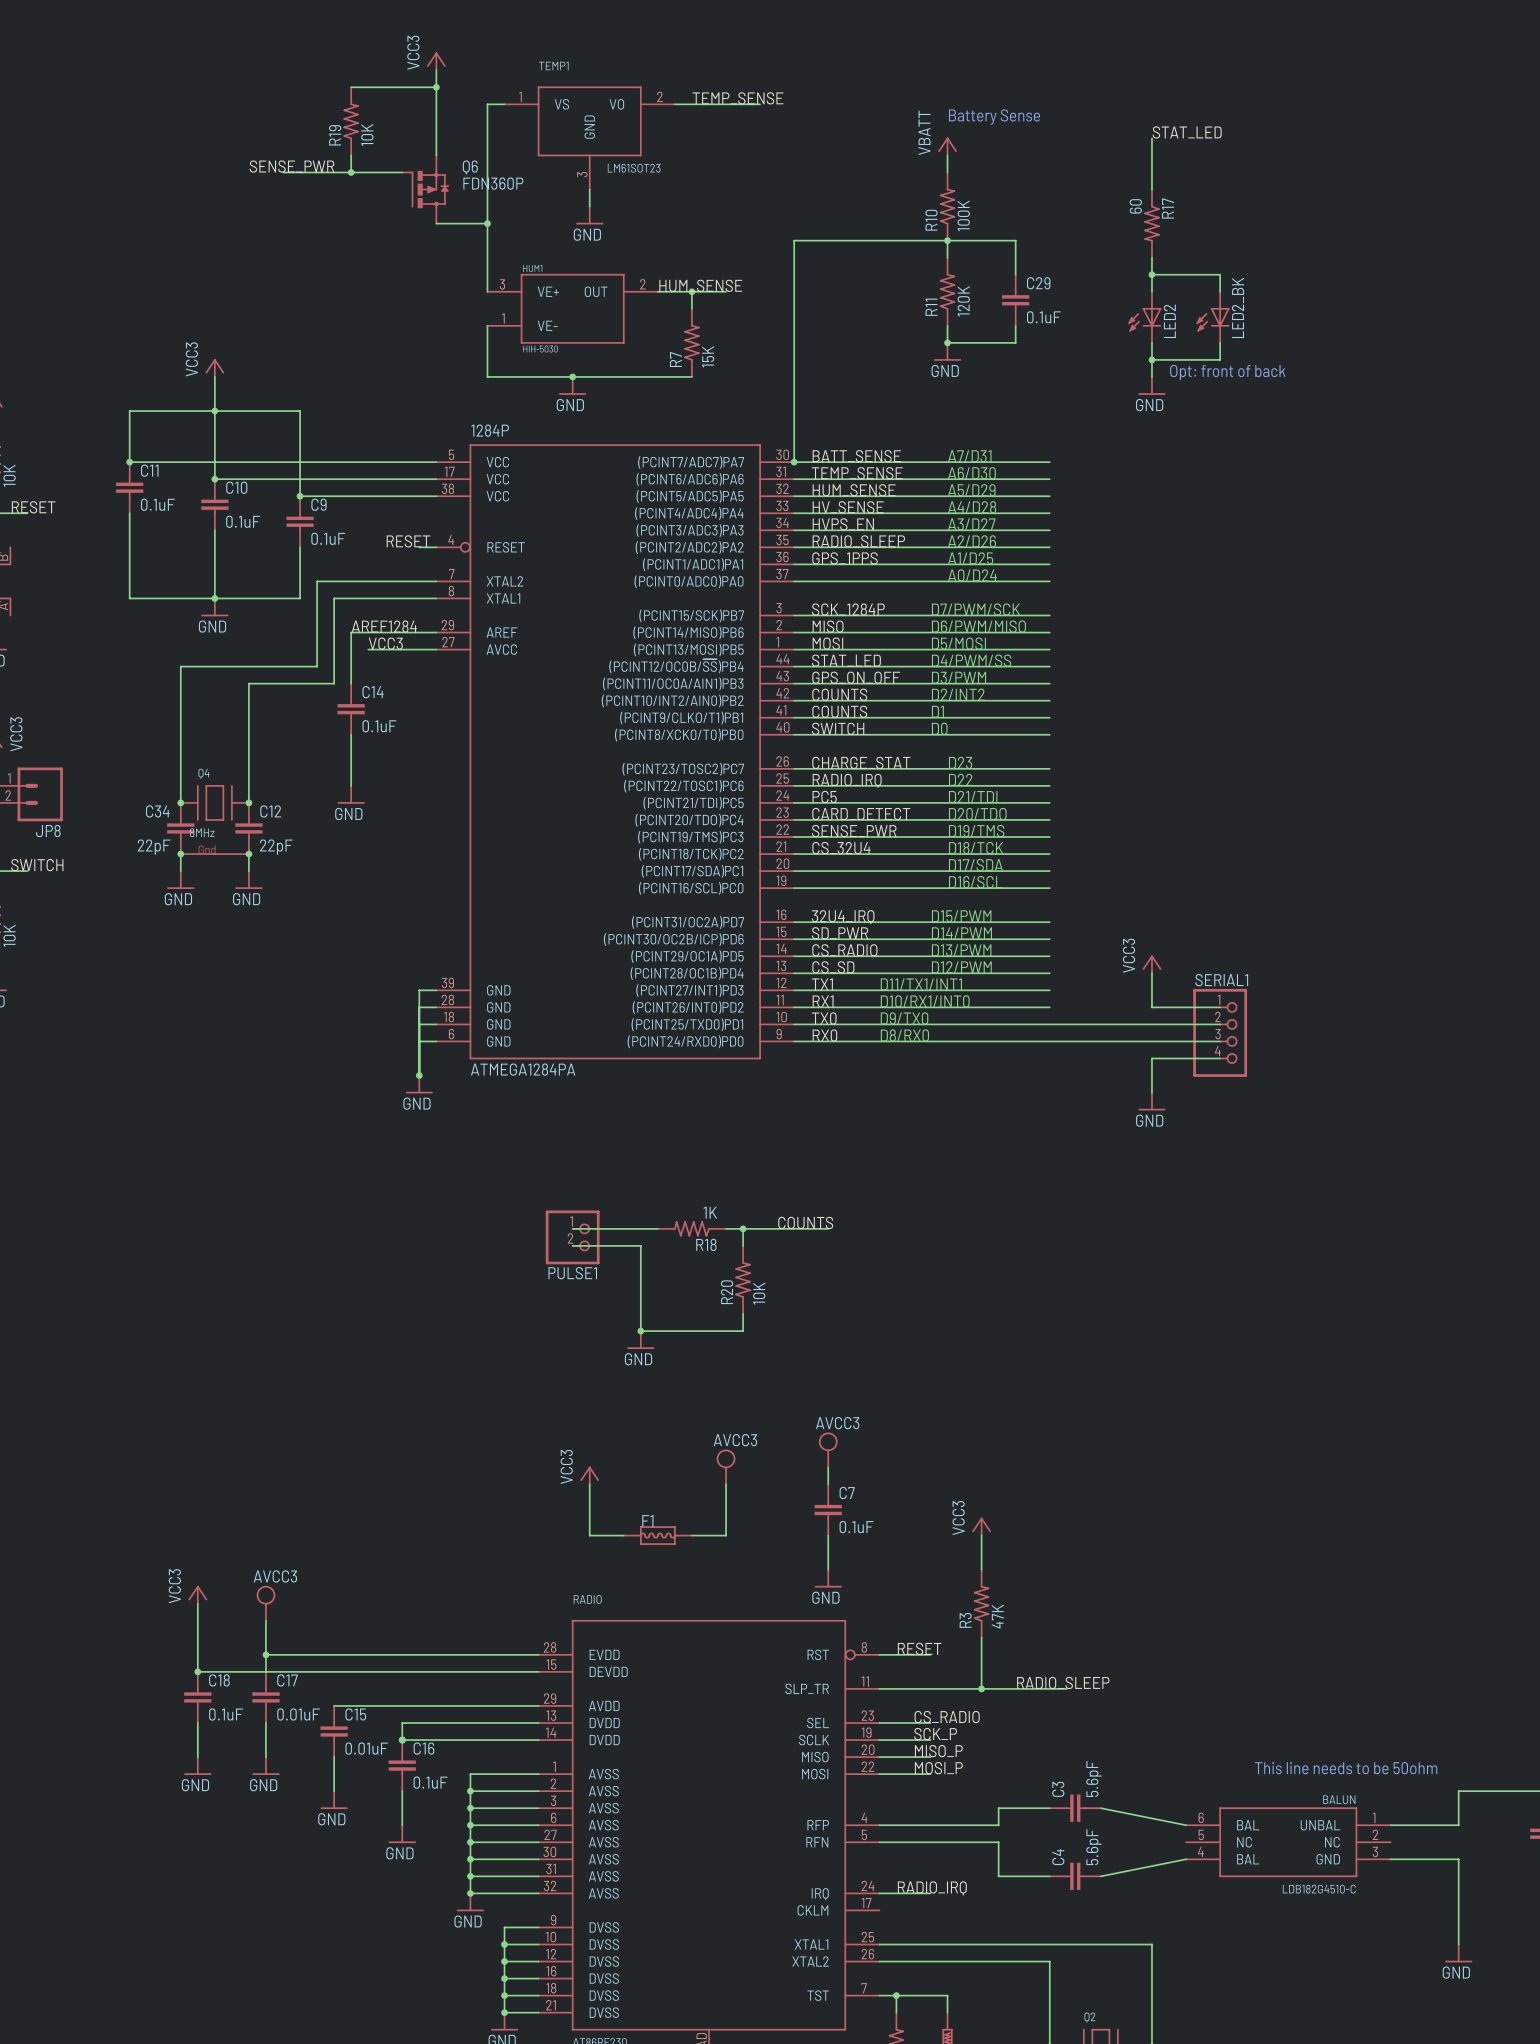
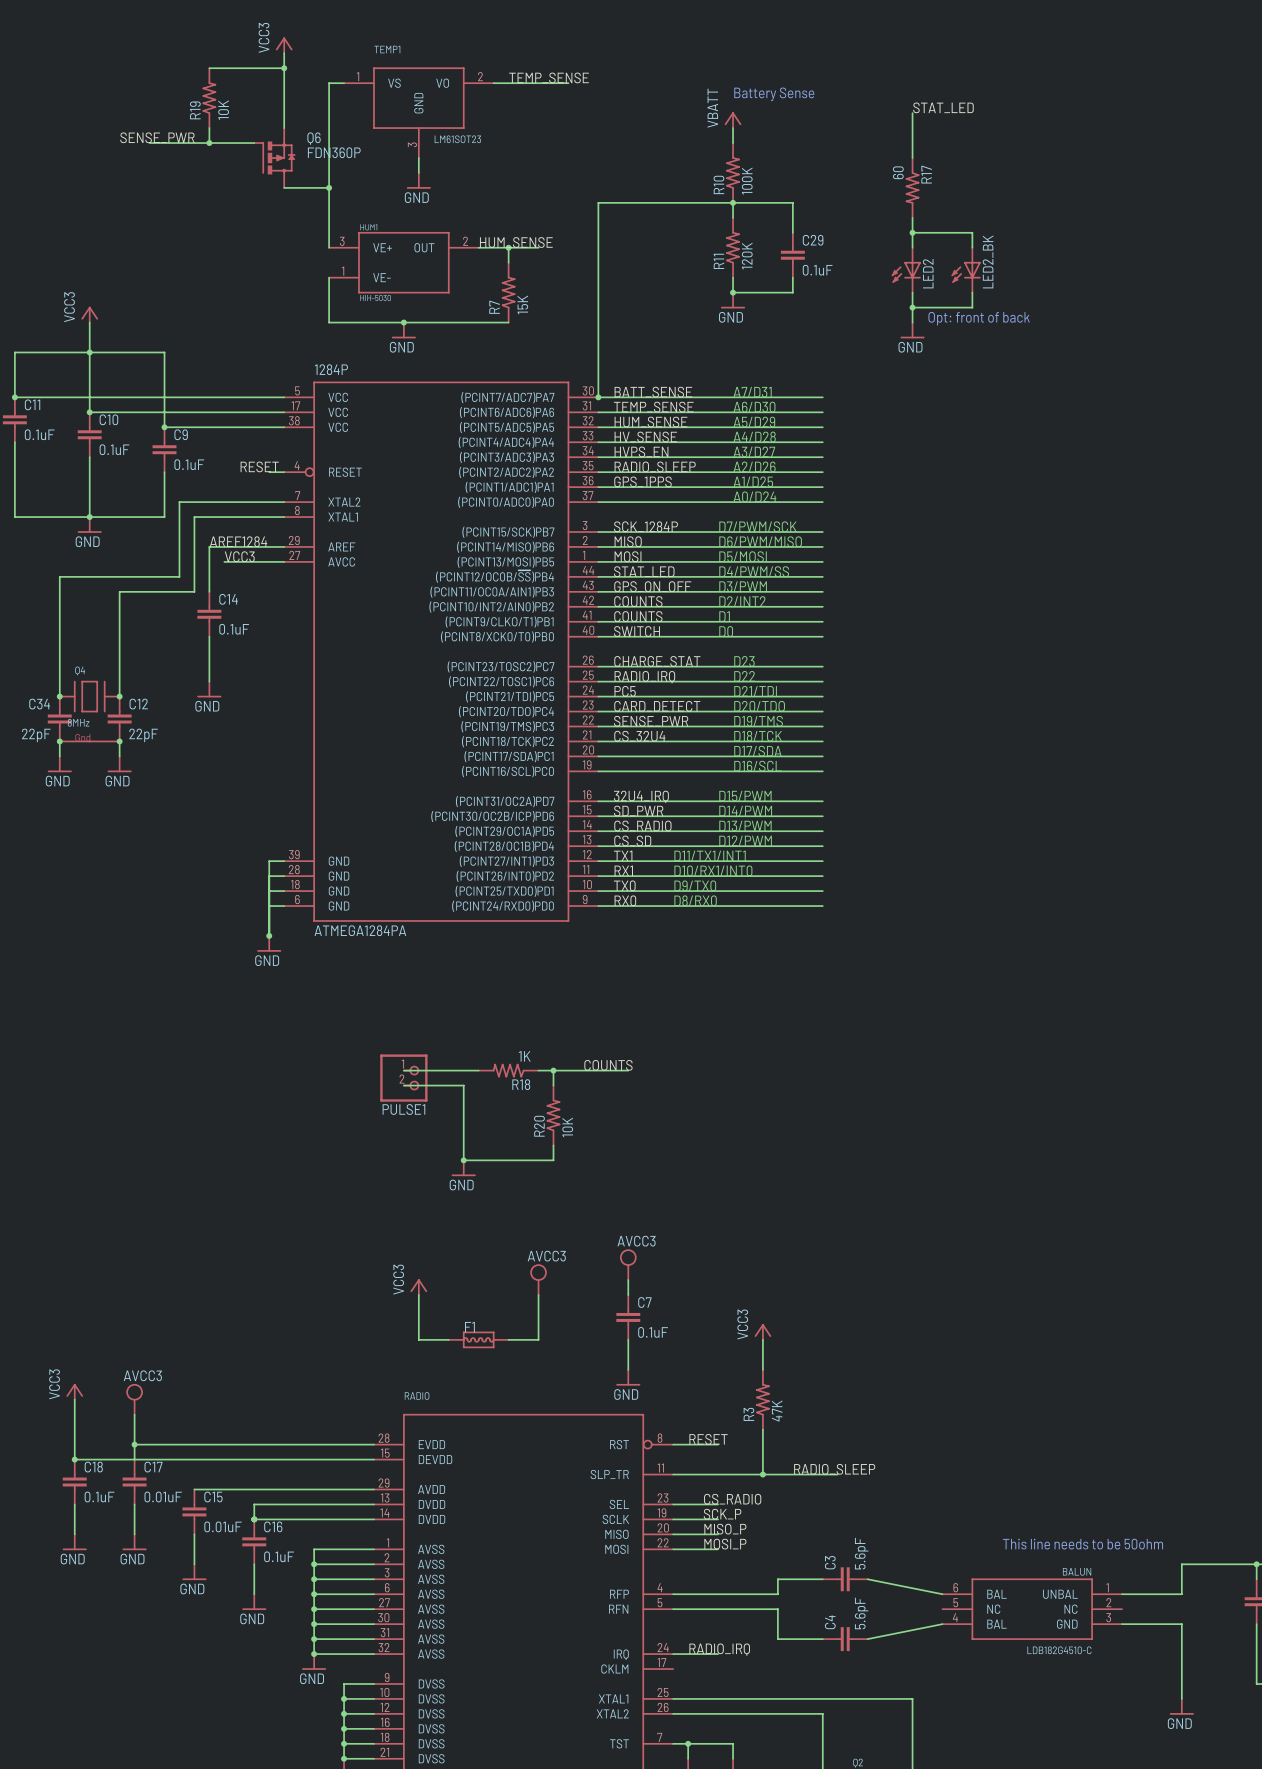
power symbol: VCC3 (1151, 964) -> none
wire: (1151, 973) (1151, 1007) (1220, 1007) -> none
wire: (1049, 1024) (1220, 1024) -> none
SERIAL1: (1220, 1032) -> none
wire: (1049, 1041) (1220, 1041) -> none
wire: (1220, 1058) (1151, 1058) (1151, 1092) -> none
power symbol: GND (1151, 1101) -> none

